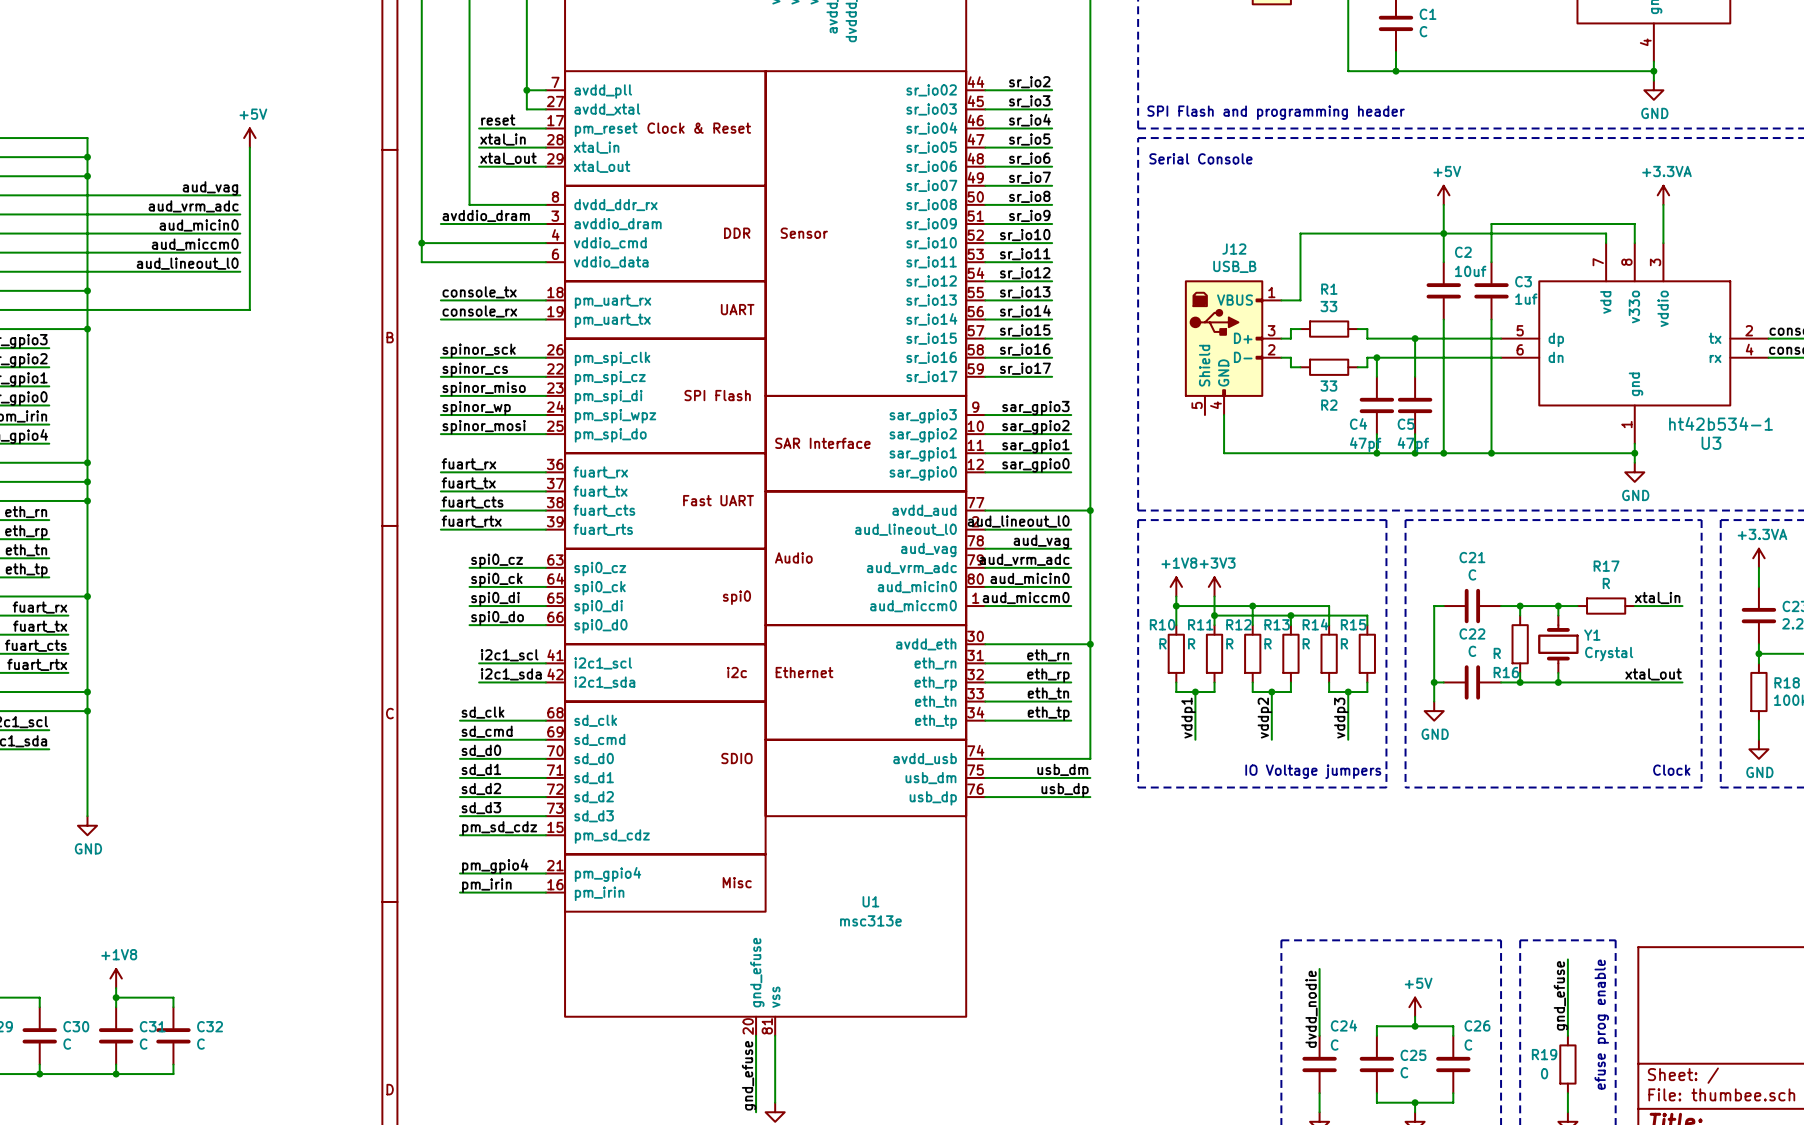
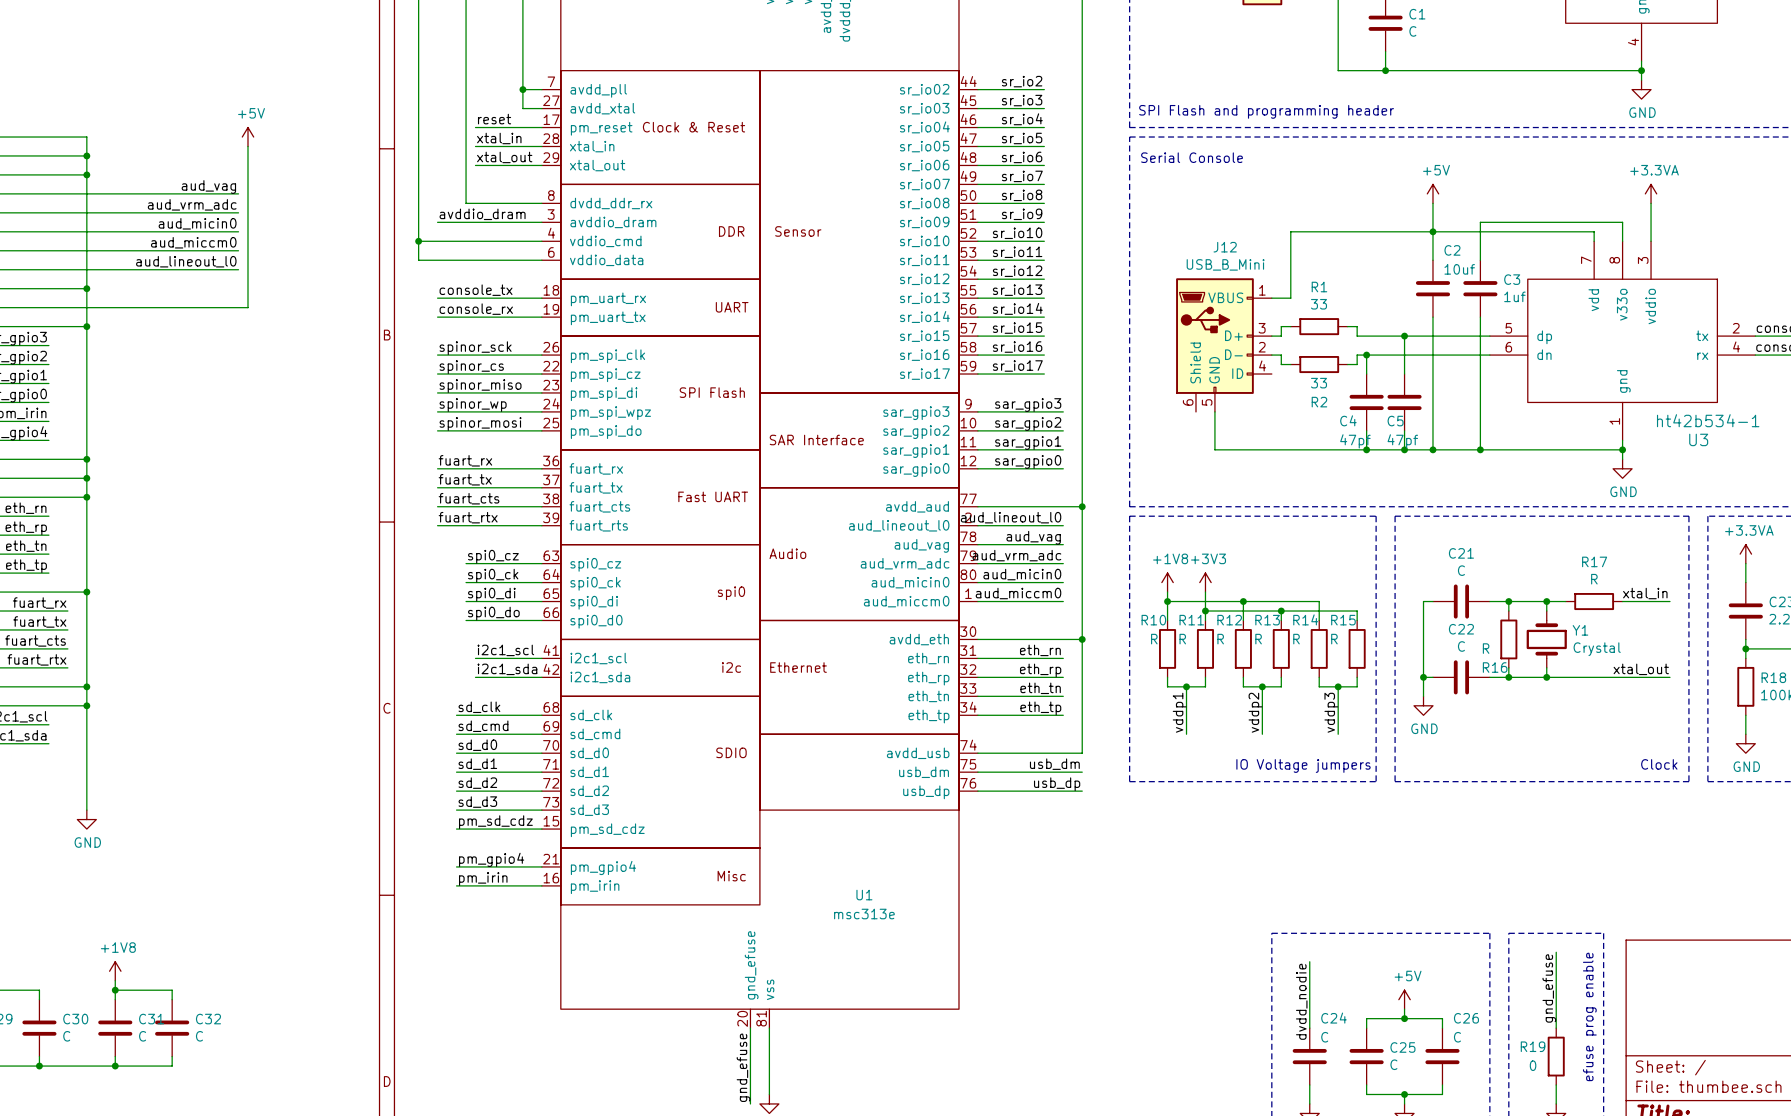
J12 value: USB_B (1234, 266) -> USB_B_Mini (1225, 264)
J12 symbol: [1184, 280, 1282, 416] -> [1176, 278, 1272, 412]

